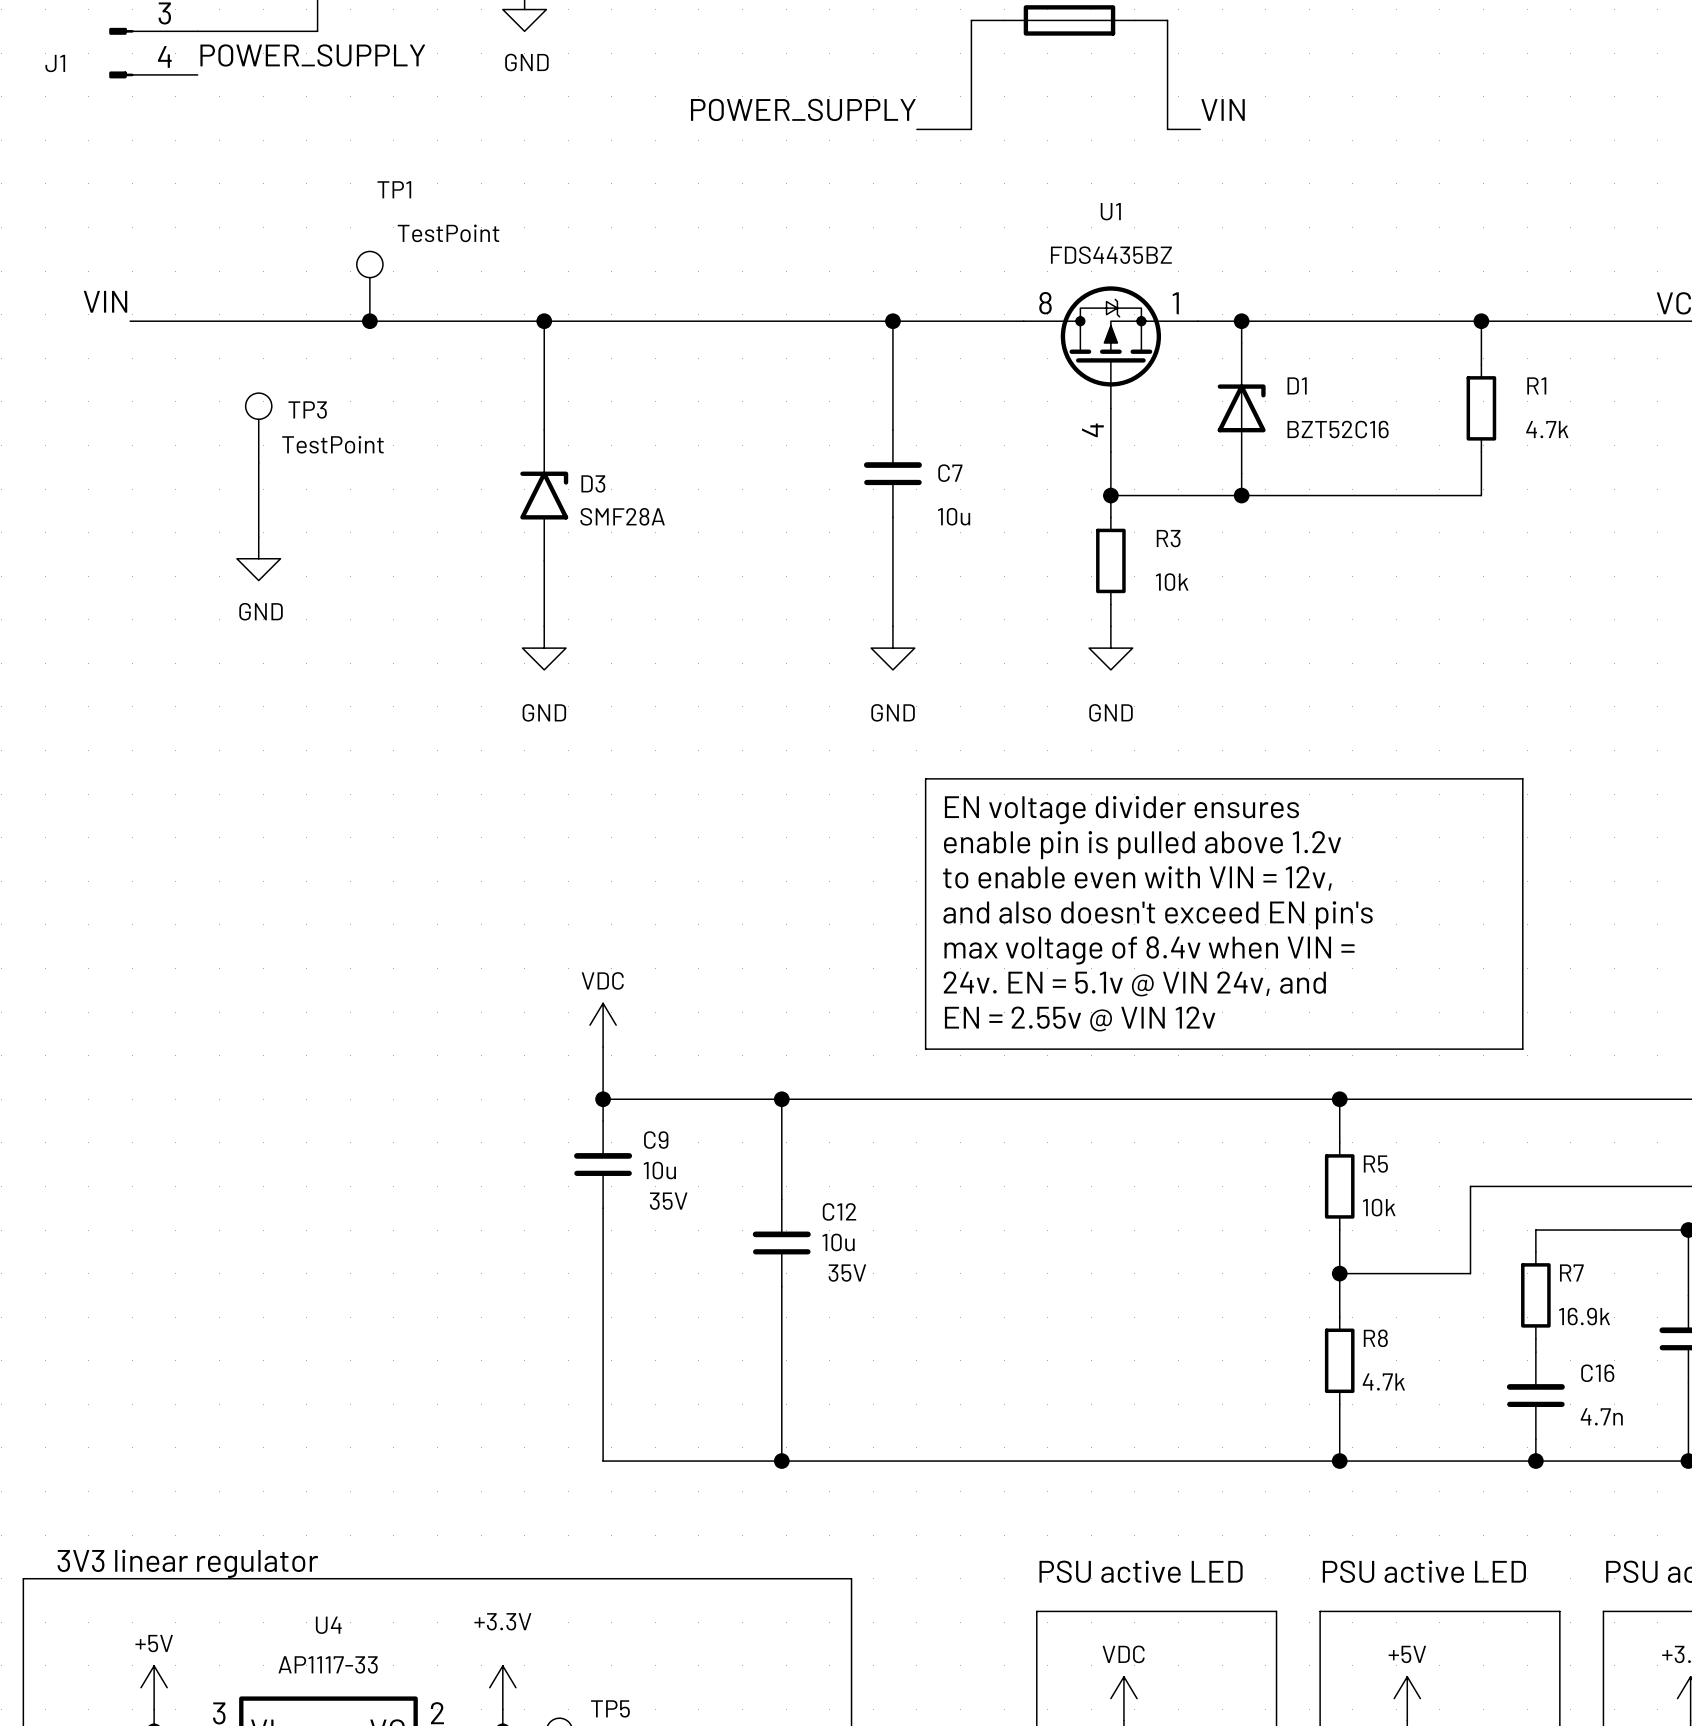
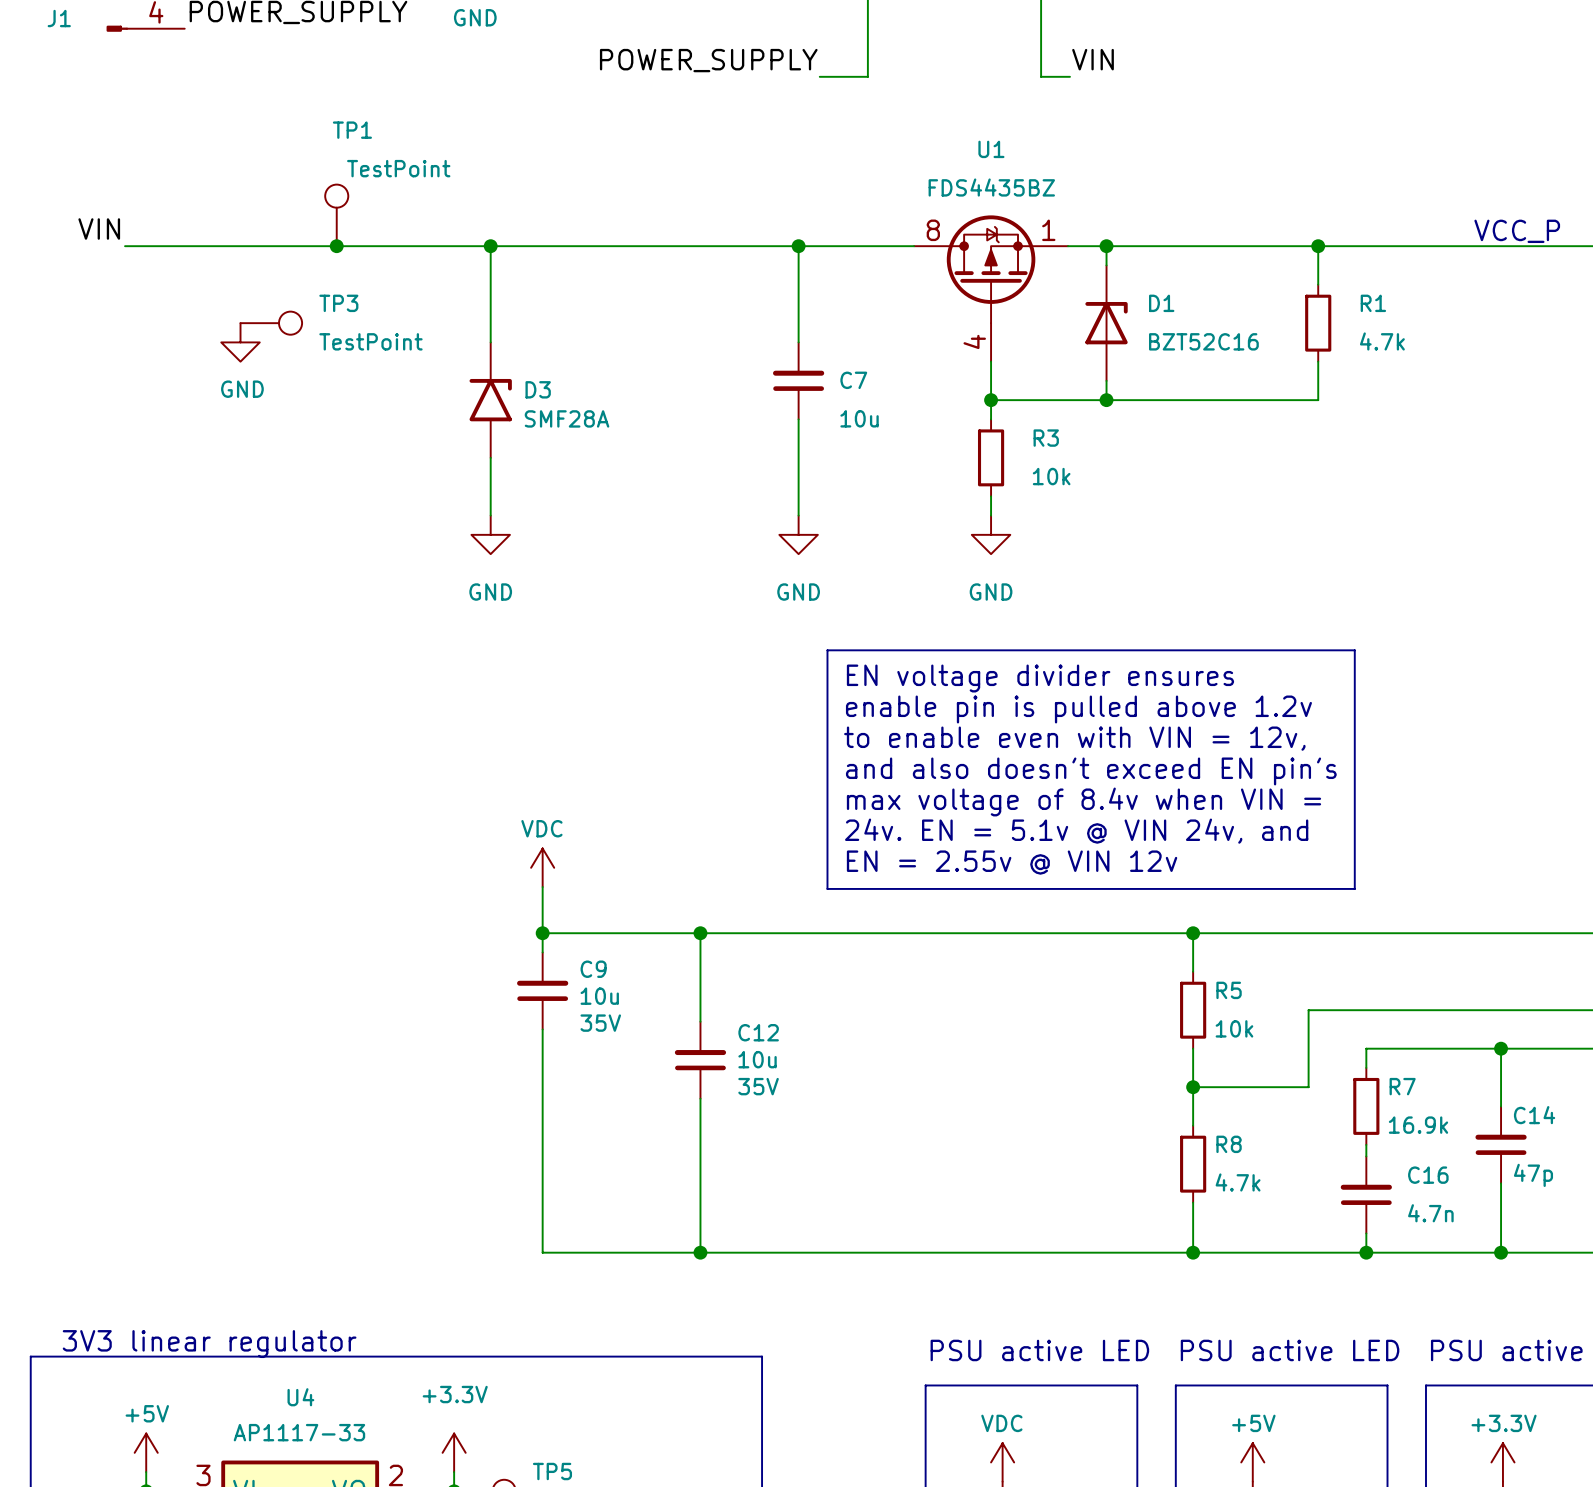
TP3 rotation: 0° (258, 406) -> 90° clockwise (290, 323)
TP3 name position: TP3 (307, 410) -> TP3 (338, 303)
TP3 position: (258, 427) -> (271, 323)
TP3 value position: TestPoint (332, 444) -> TestPoint (370, 341)
wire: (258, 462) (258, 536) -> none
power symbol position: GND (258, 558) -> GND (240, 342)

